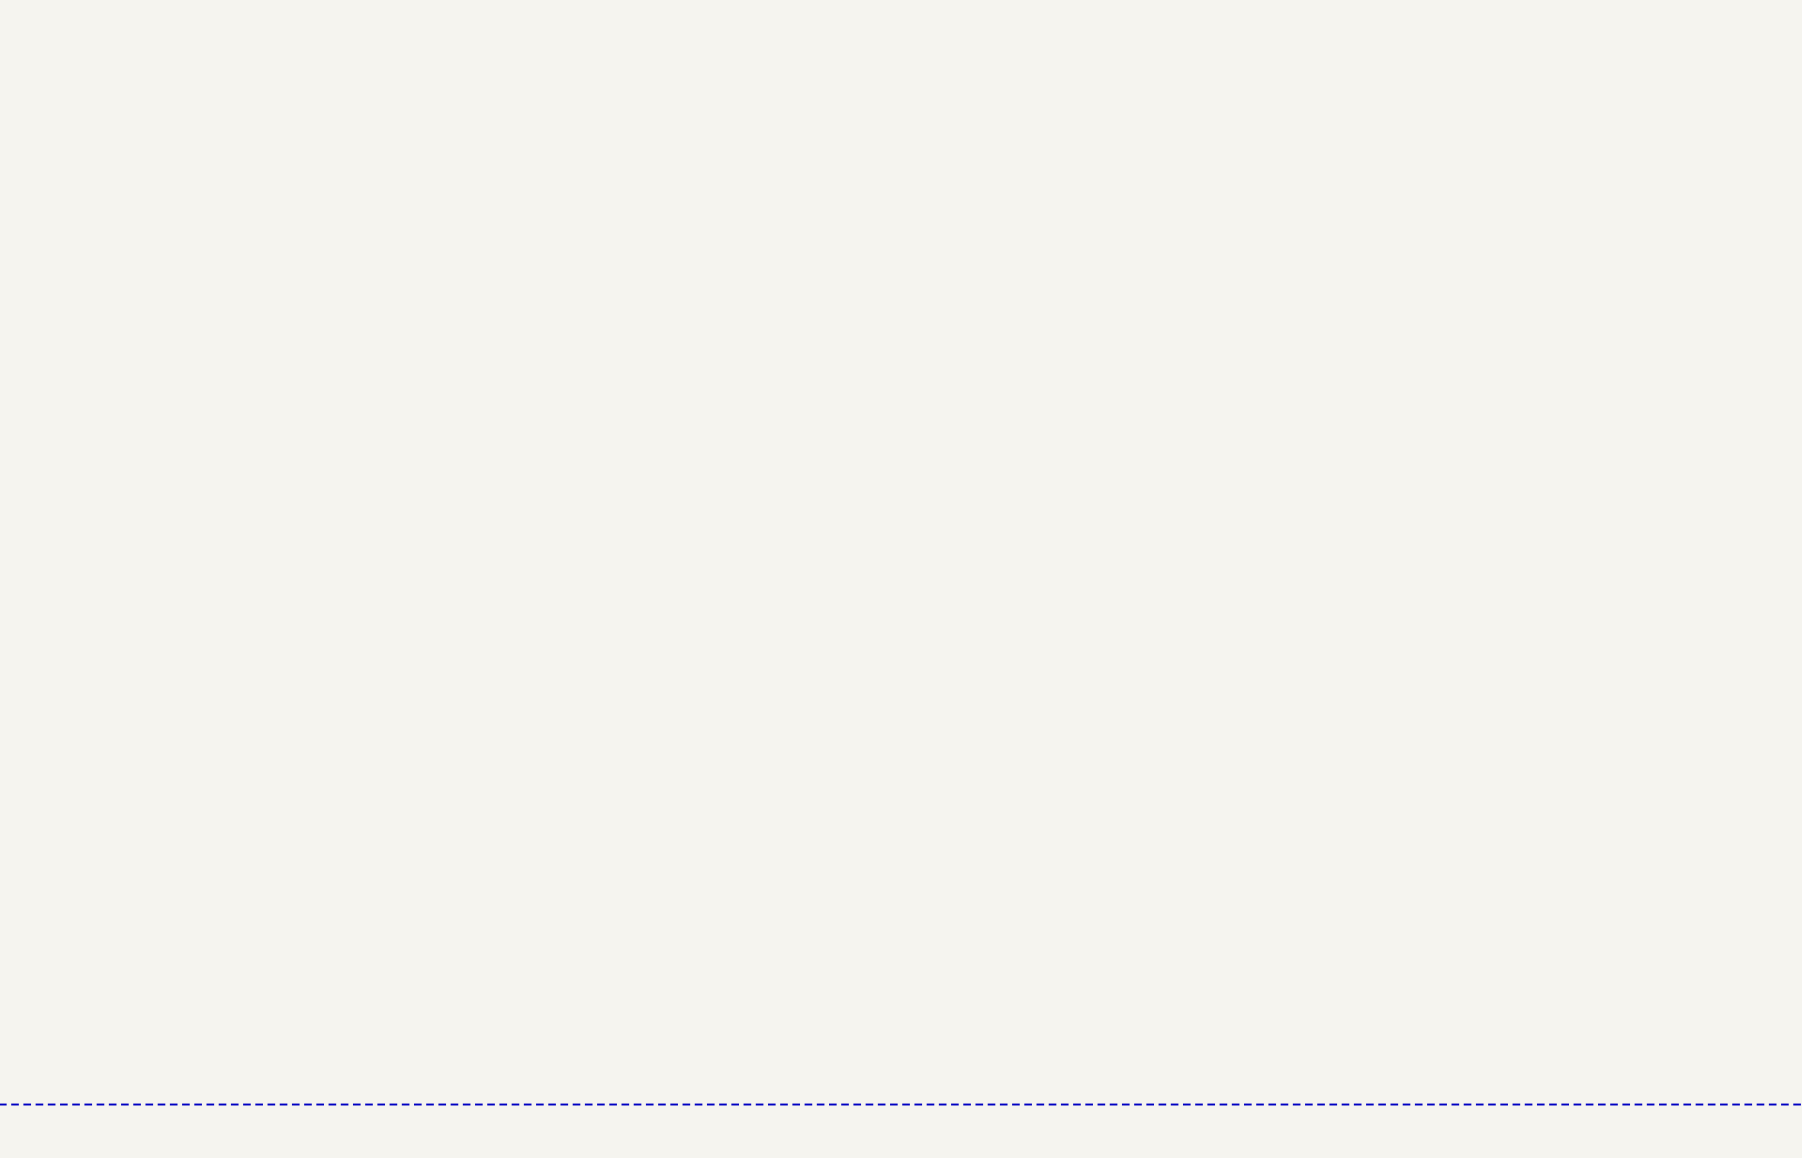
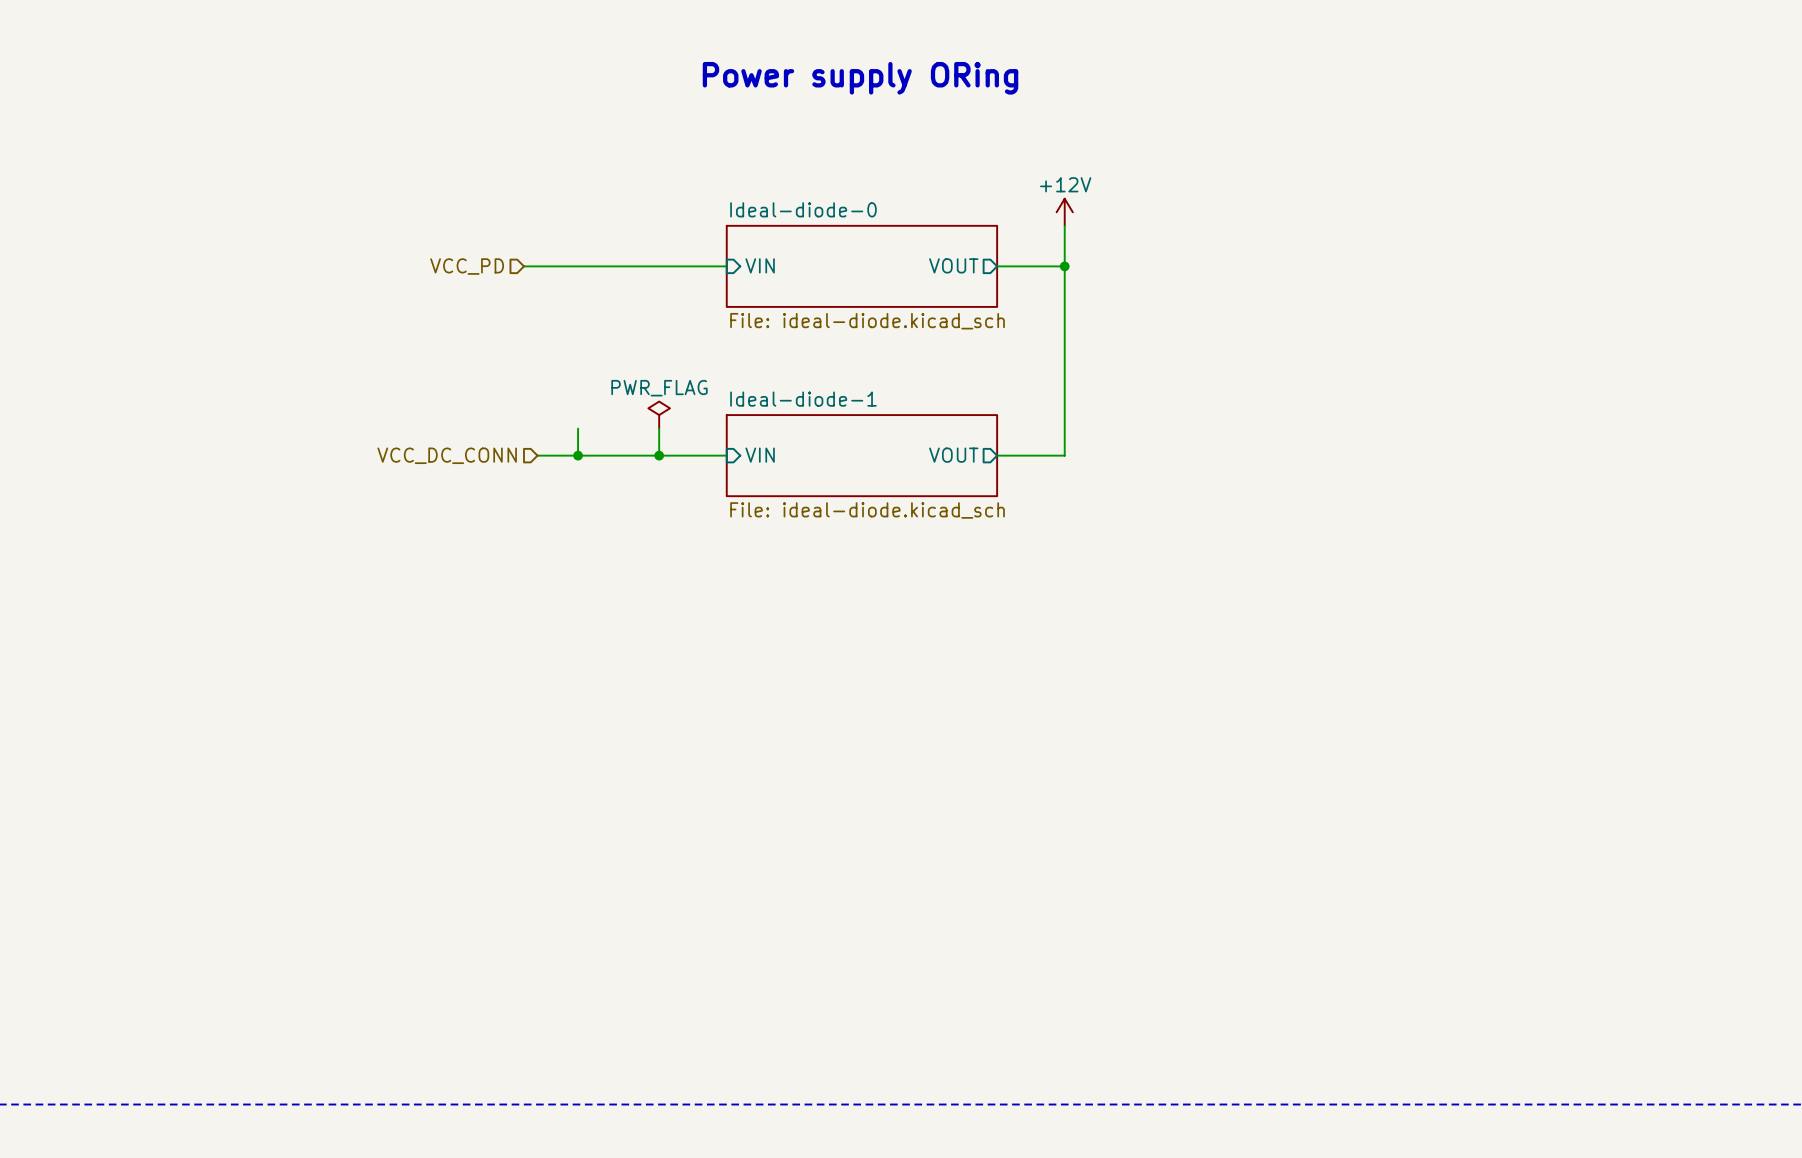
text: none -> Power supply ORing (860, 78)
power symbol: none -> +12V (1064, 212)
wire: none -> (1064, 225) (1064, 455) (997, 455)
sheet pin: none -> VIN (760, 265)
sheet pin: none -> VOUT (953, 265)
hierarchical label: none -> VCC_PD (467, 266)
wire: none -> (523, 266) (726, 266)
sheet Ideal-diode-0: none -> File: ideal-diode.kicad_sch (861, 266)
wire: none -> (997, 266) (1064, 266)
junction: none -> (1064, 266)
power symbol: none -> PWR_FLAG (659, 415)
wire: none -> (578, 428) (578, 455)
wire: none -> (659, 428) (659, 455)
hierarchical label: none -> VCC_DC_CONN (447, 455)
wire: none -> (537, 455) (726, 455)
junction: none -> (578, 455)
junction: none -> (659, 455)
sheet pin: none -> VIN (760, 455)
sheet Ideal-diode-1: none -> File: ideal-diode.kicad_sch (861, 455)
sheet pin: none -> VOUT (953, 455)

